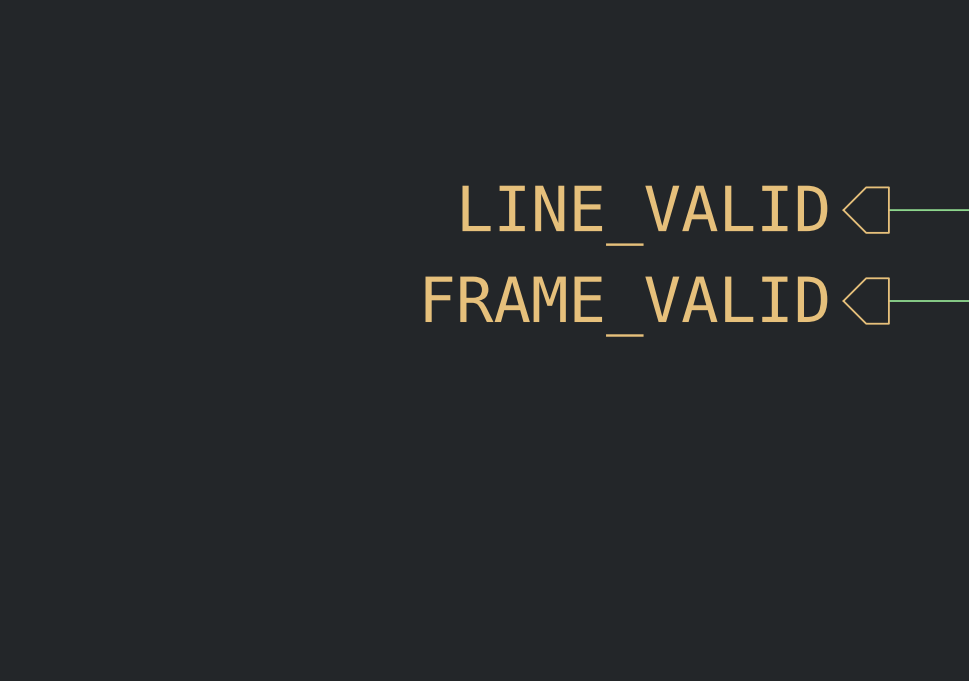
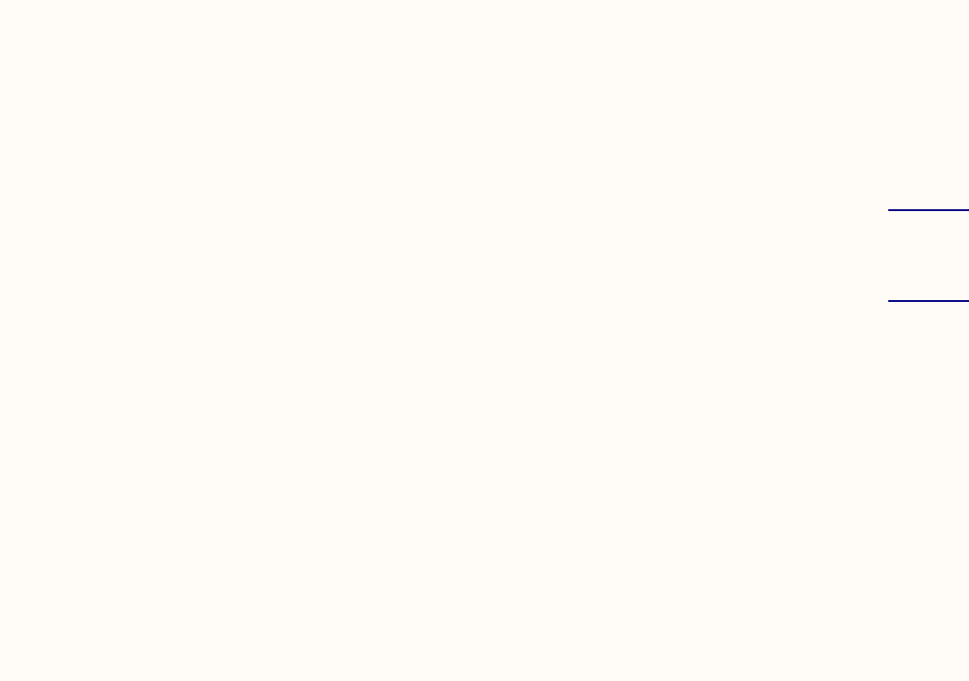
hierarchical label: LINE_VALID (644, 215) -> none
hierarchical label: FRAME_VALID (626, 306) -> none

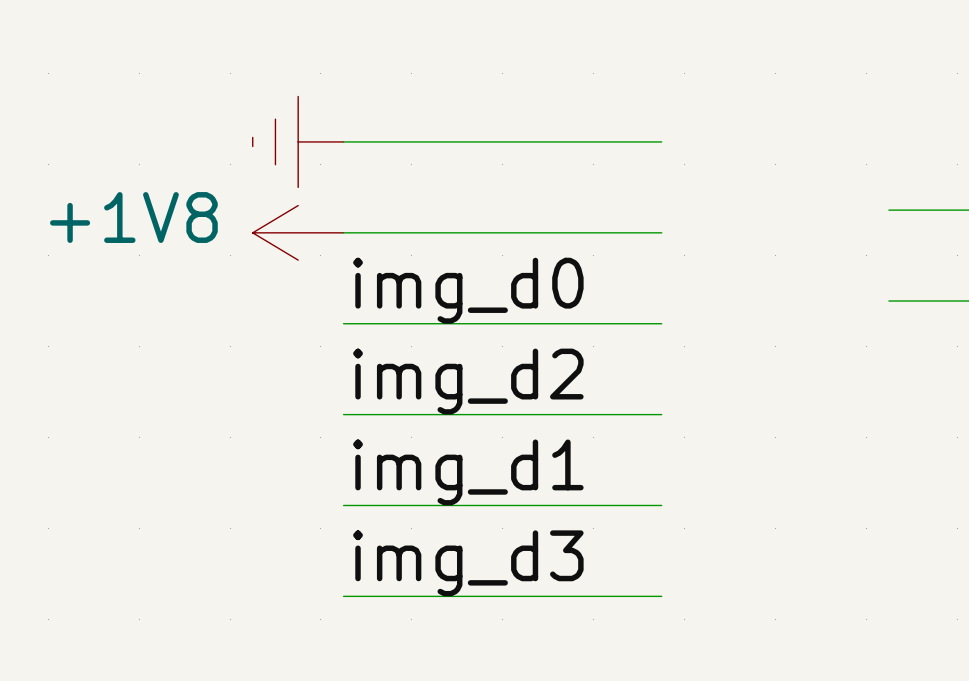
power symbol: none -> (298, 141)
wire: none -> (343, 141) (661, 141)
power symbol: none -> +1V8 (298, 232)
wire: none -> (343, 232) (661, 232)
label: none -> img_d0 (468, 290)
wire: none -> (343, 323) (661, 323)
label: none -> img_d2 (468, 381)
wire: none -> (343, 414) (661, 414)
label: none -> img_d1 (468, 472)
wire: none -> (343, 505) (661, 505)
label: none -> img_d3 (468, 563)
wire: none -> (343, 596) (661, 596)

